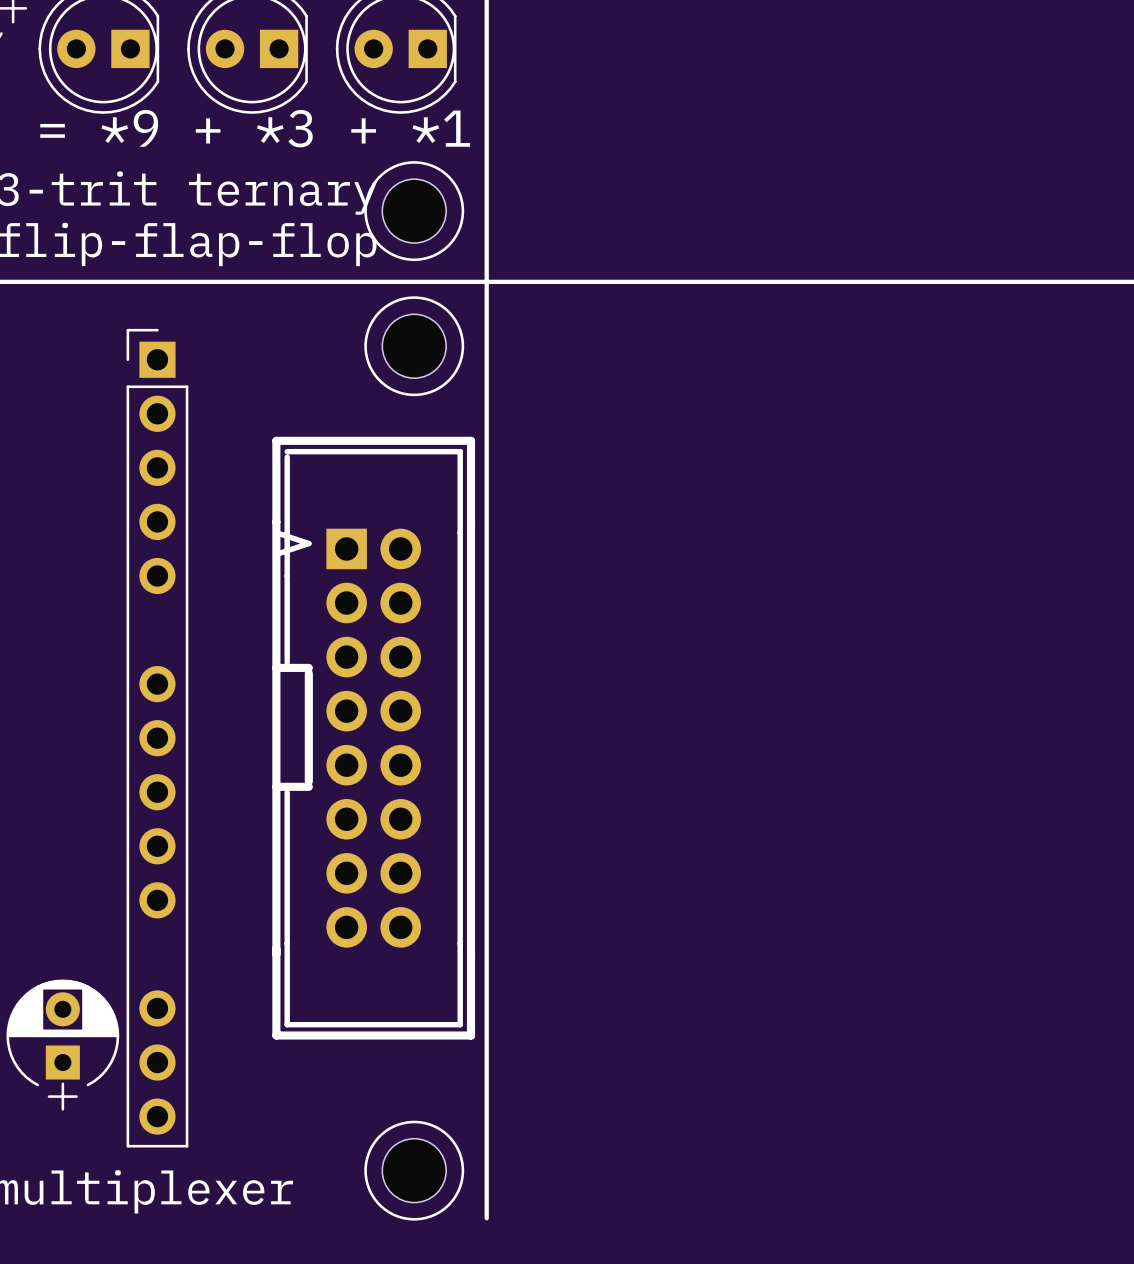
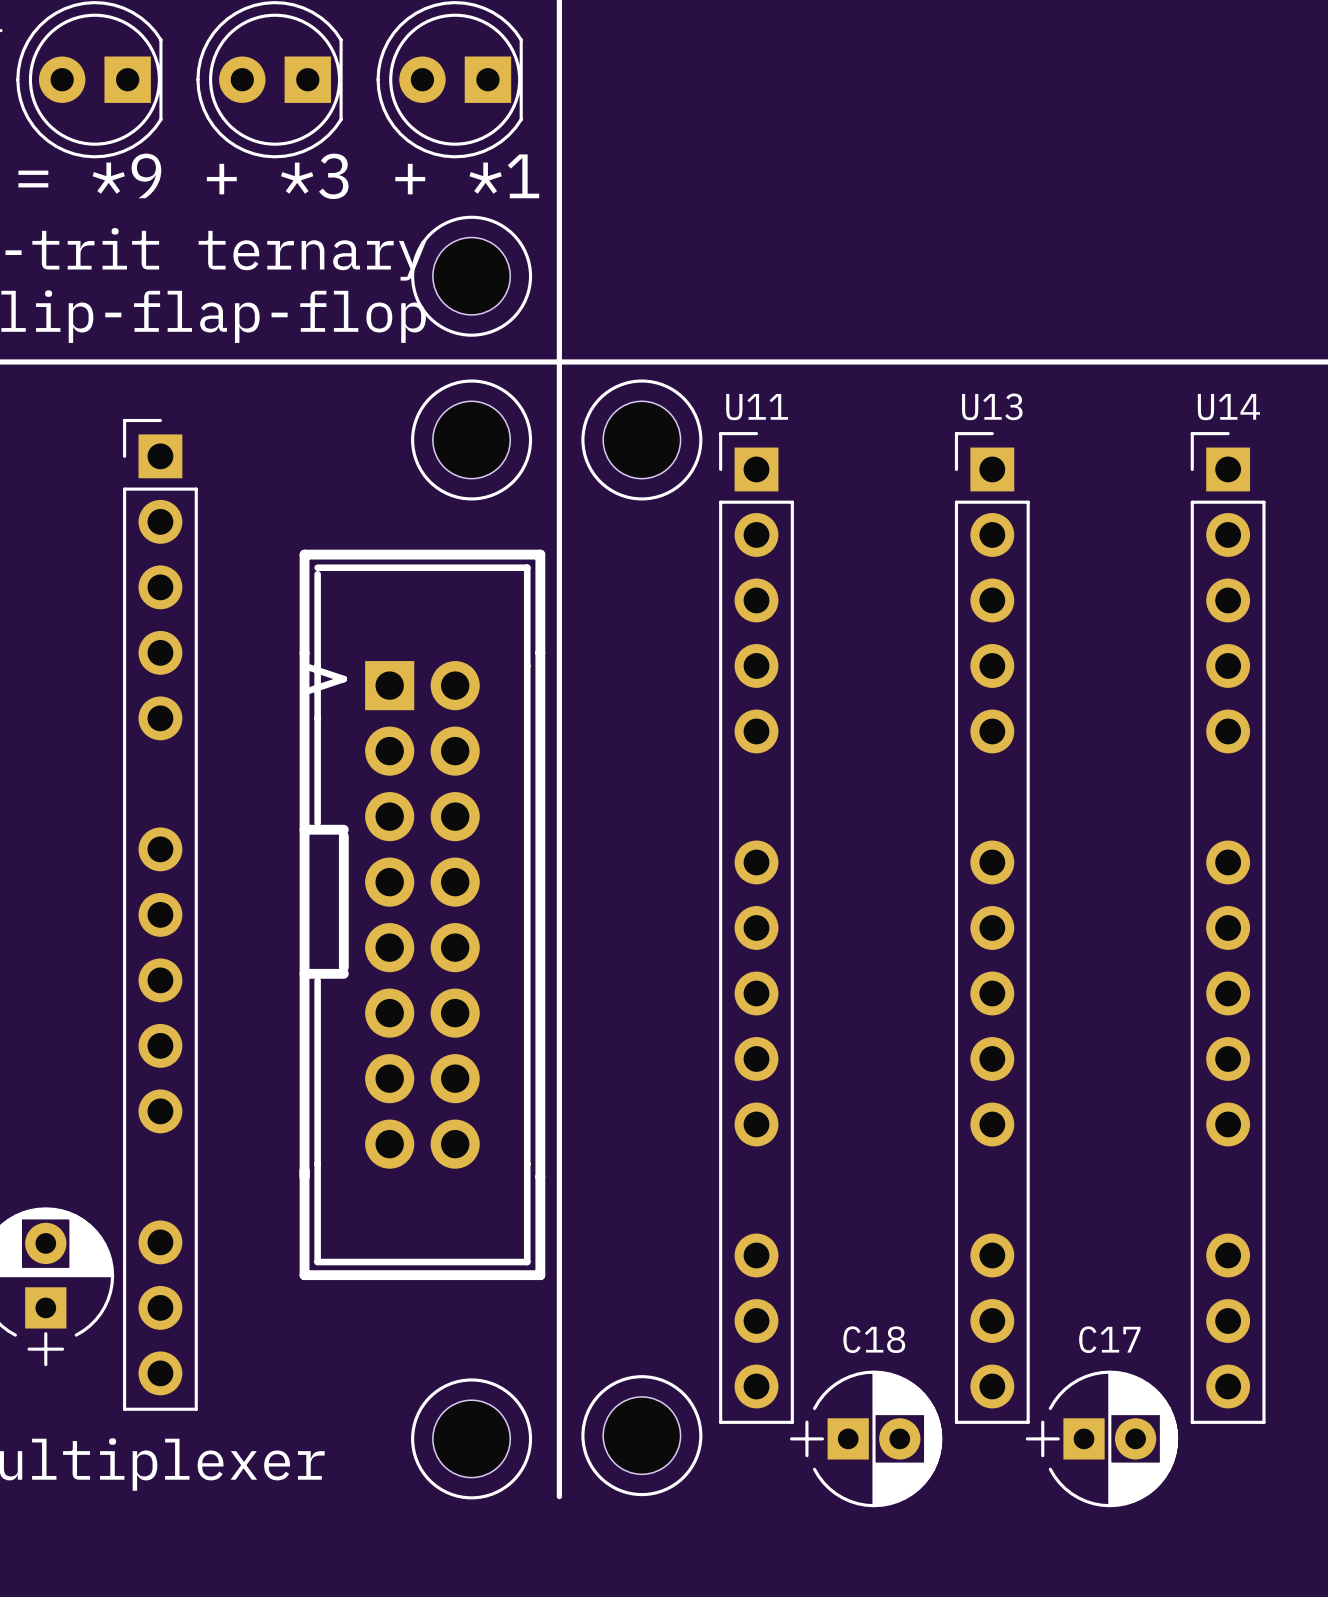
part: none -> (641, 439)
U11: none -> (756, 927)
U13: none -> (992, 927)
U14: none -> (1228, 927)
part: none -> (641, 1435)
C18: none -> (866, 1438)
C17: none -> (1101, 1438)

